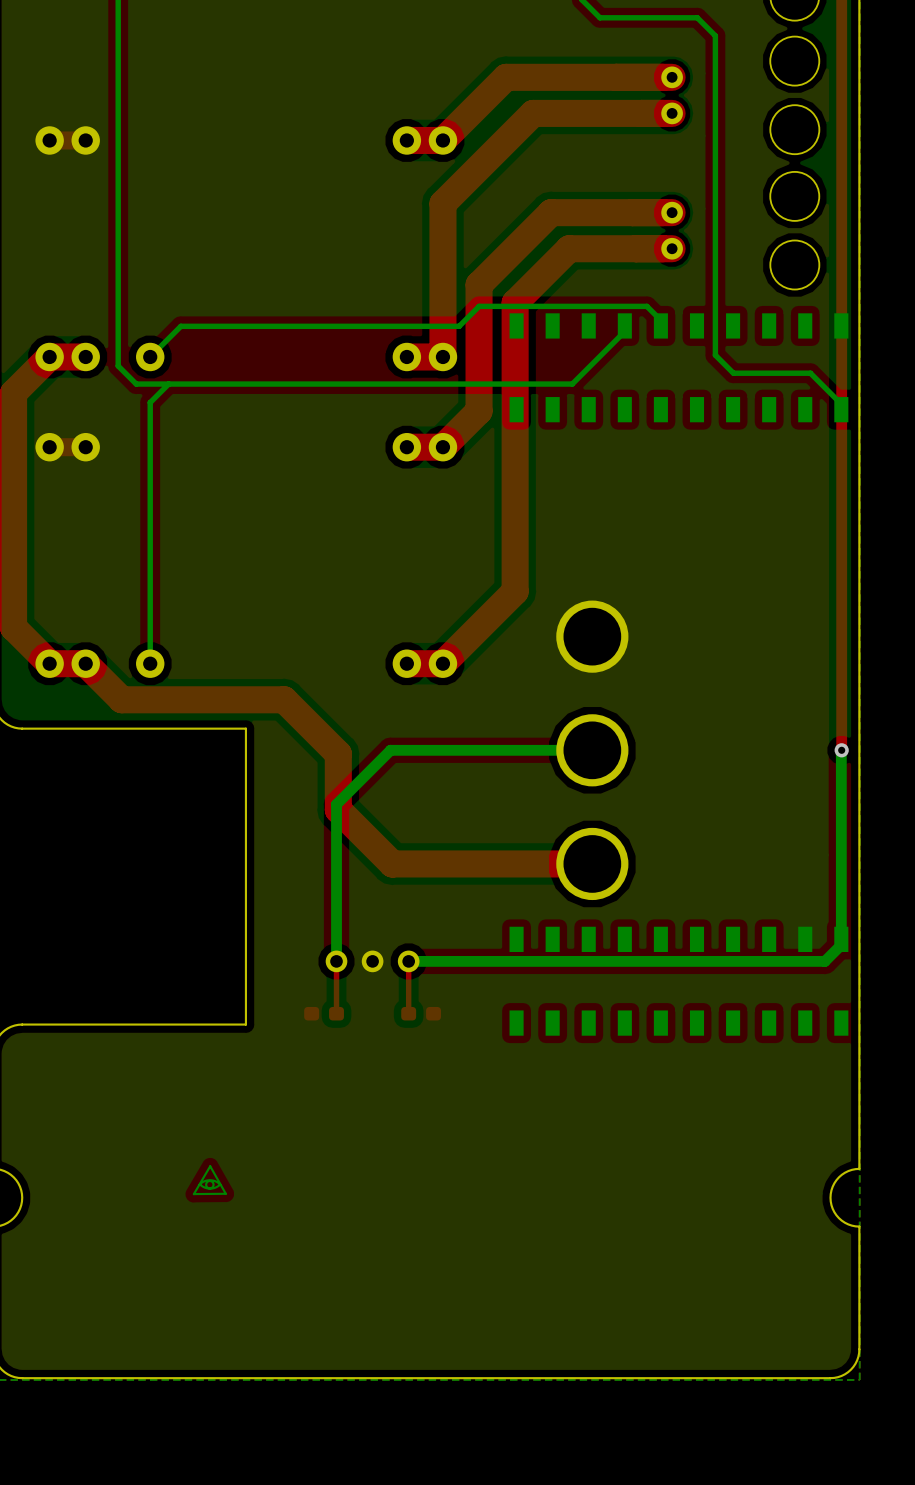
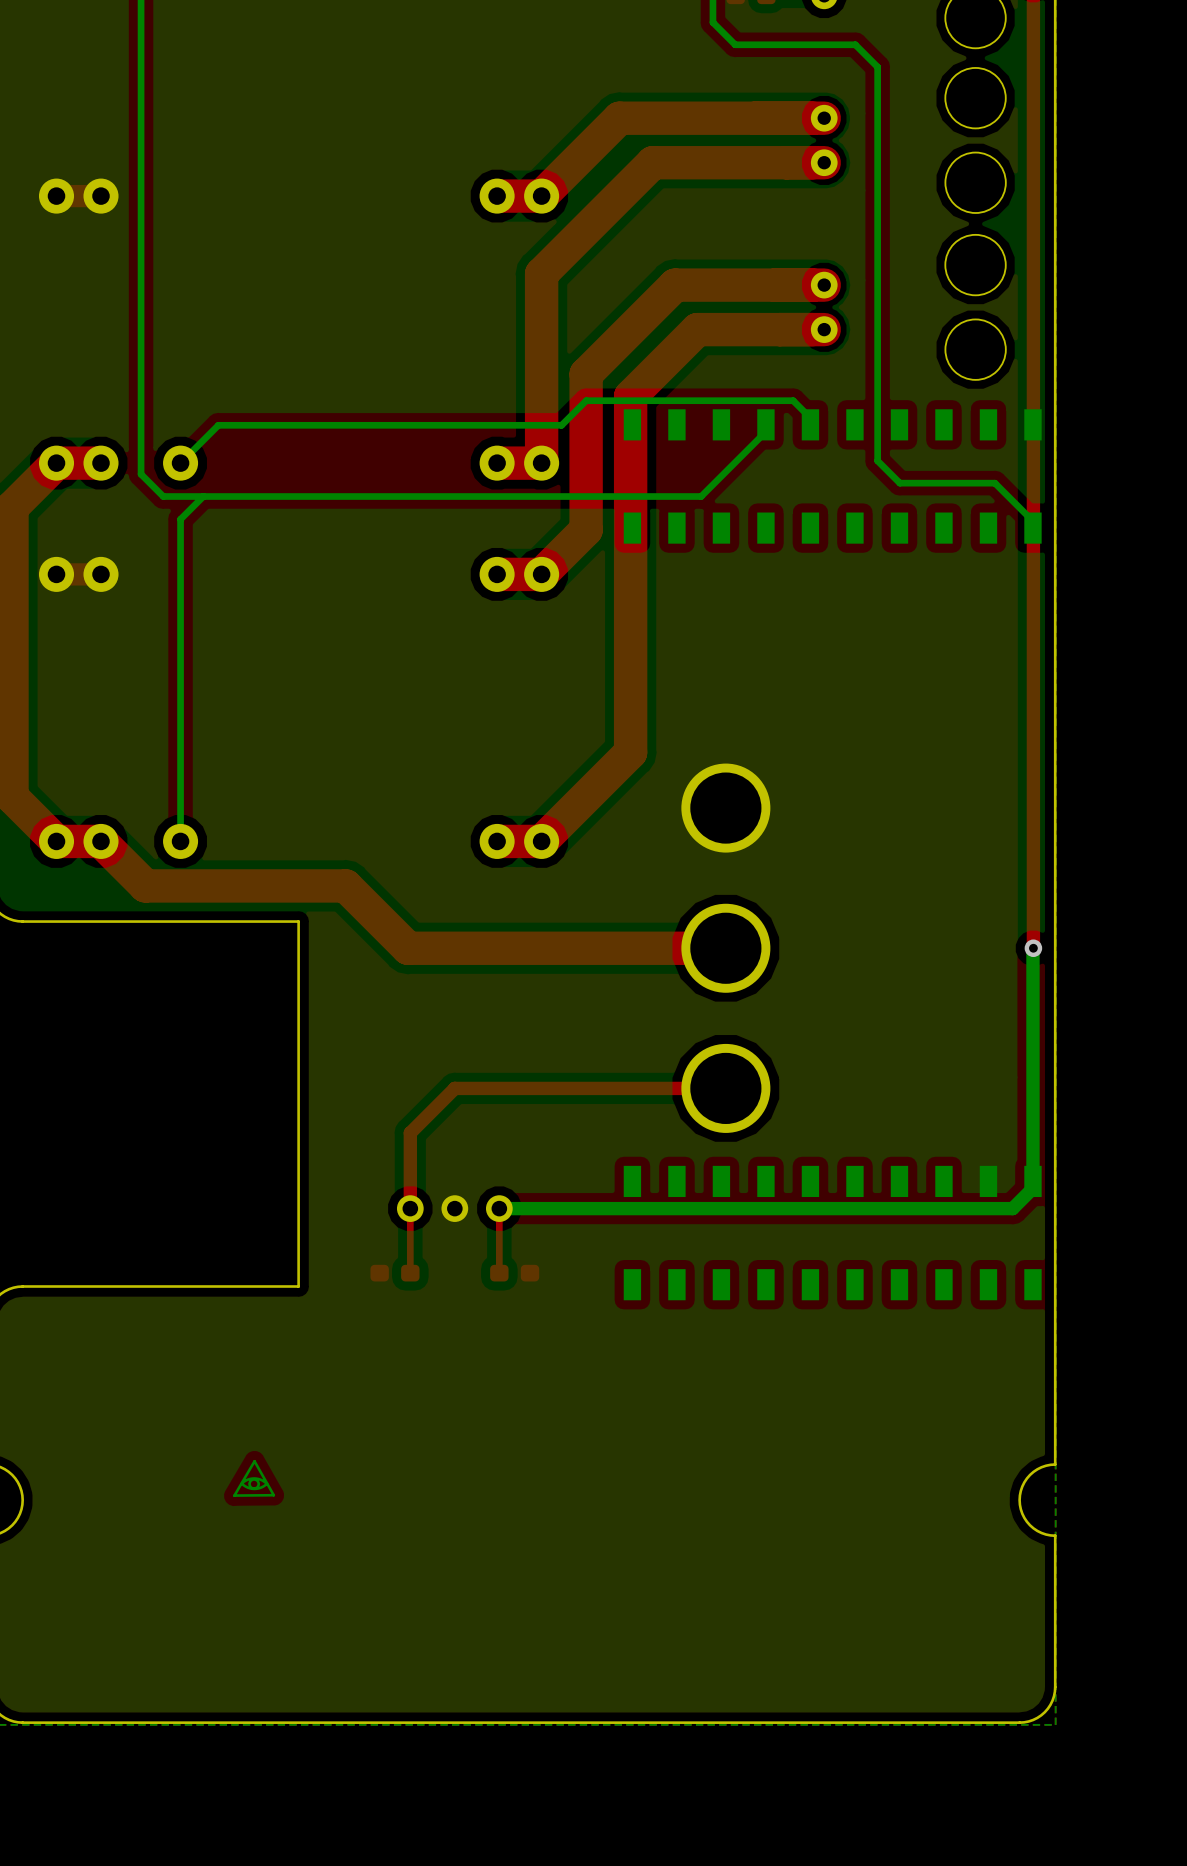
top track: (334, 750) (338, 753) (338, 809) (392, 863) -> (410, 1208) (410, 1132) (454, 1088) (479, 1088)
top track: none -> (725, 948) (408, 948)
bottom track: (592, 750) (390, 750) (336, 804) (336, 961) -> none
top track width: thick (592, 863) (392, 863) -> thin (725, 1088) (479, 1088)

